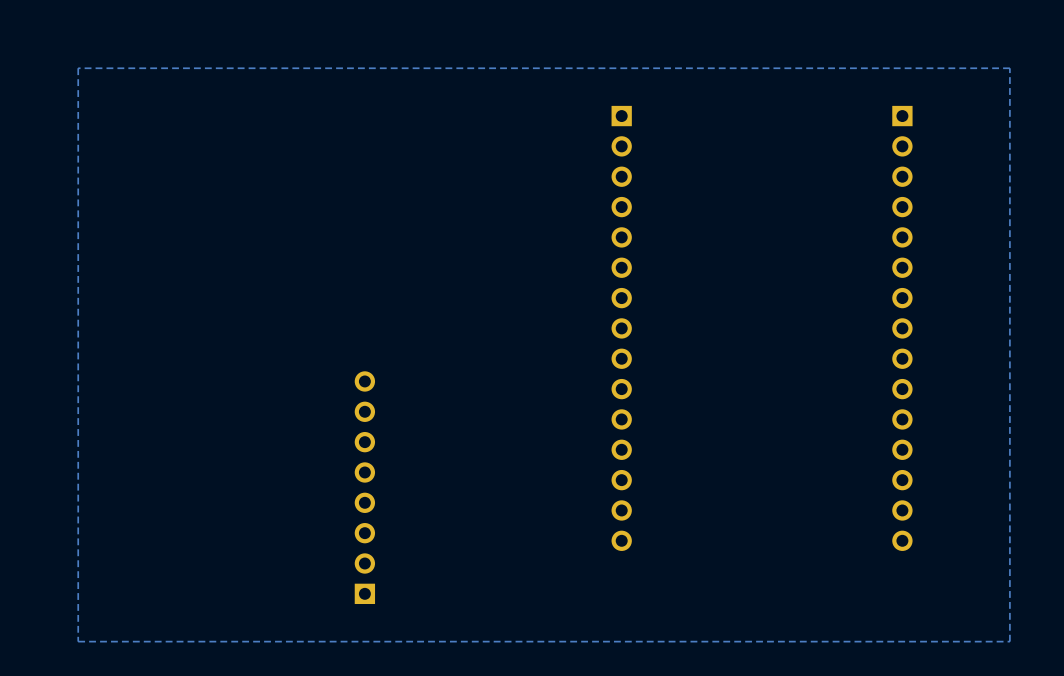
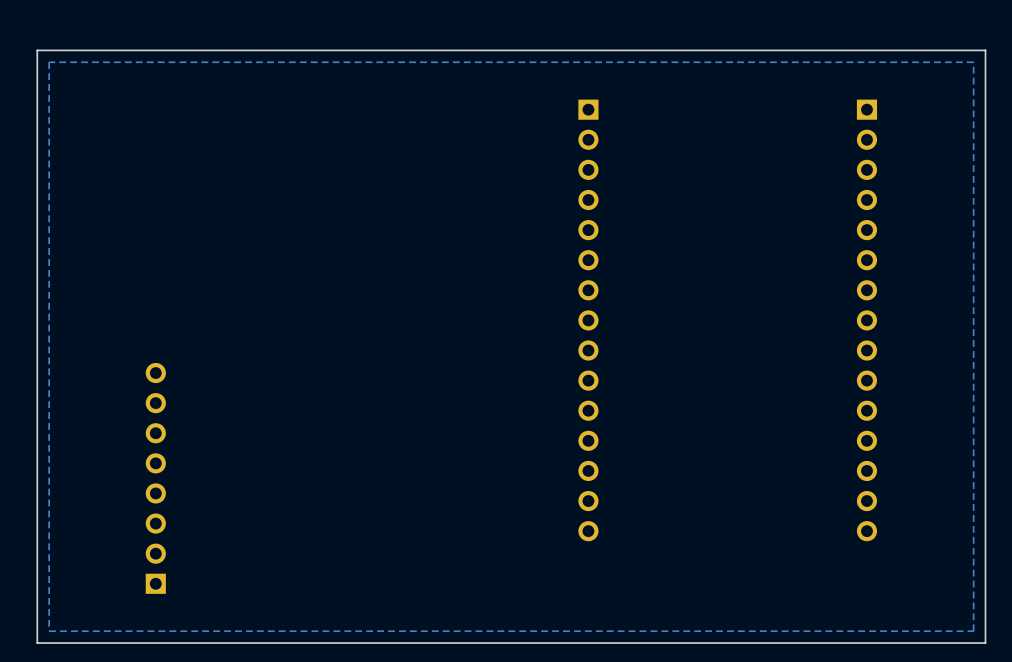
board edge: none -> (985, 50) (37, 50) (37, 643) (985, 643) (985, 50)
part position: (364, 487) -> (155, 478)

